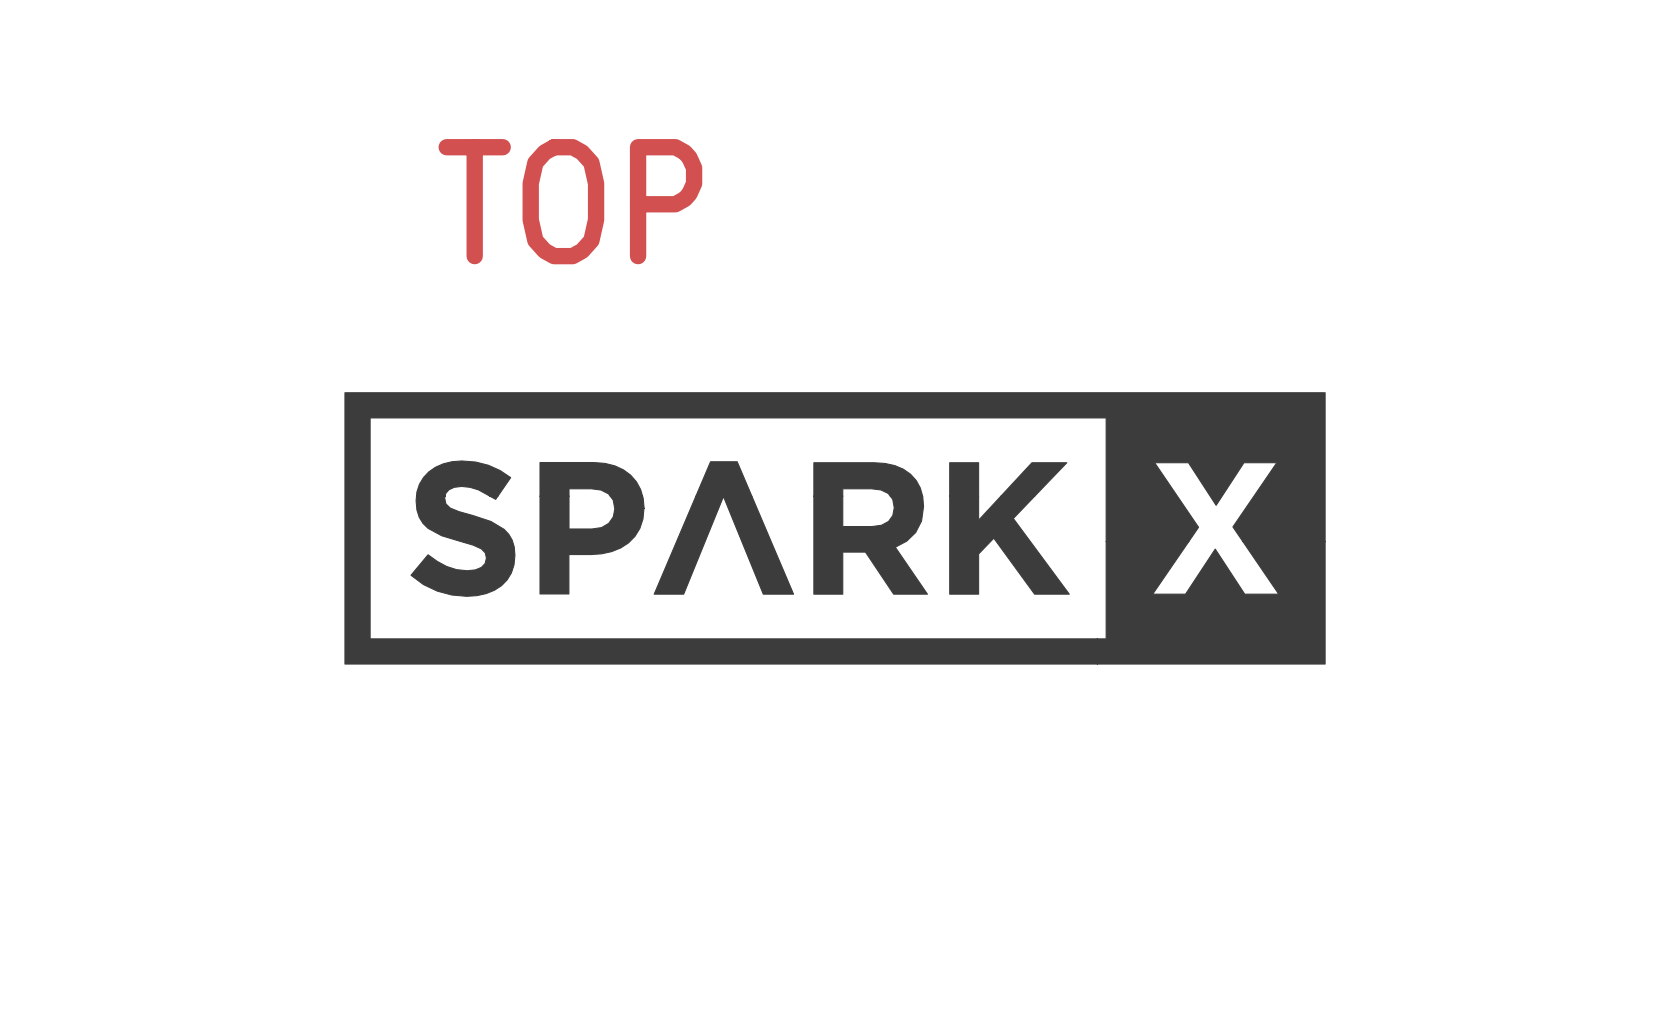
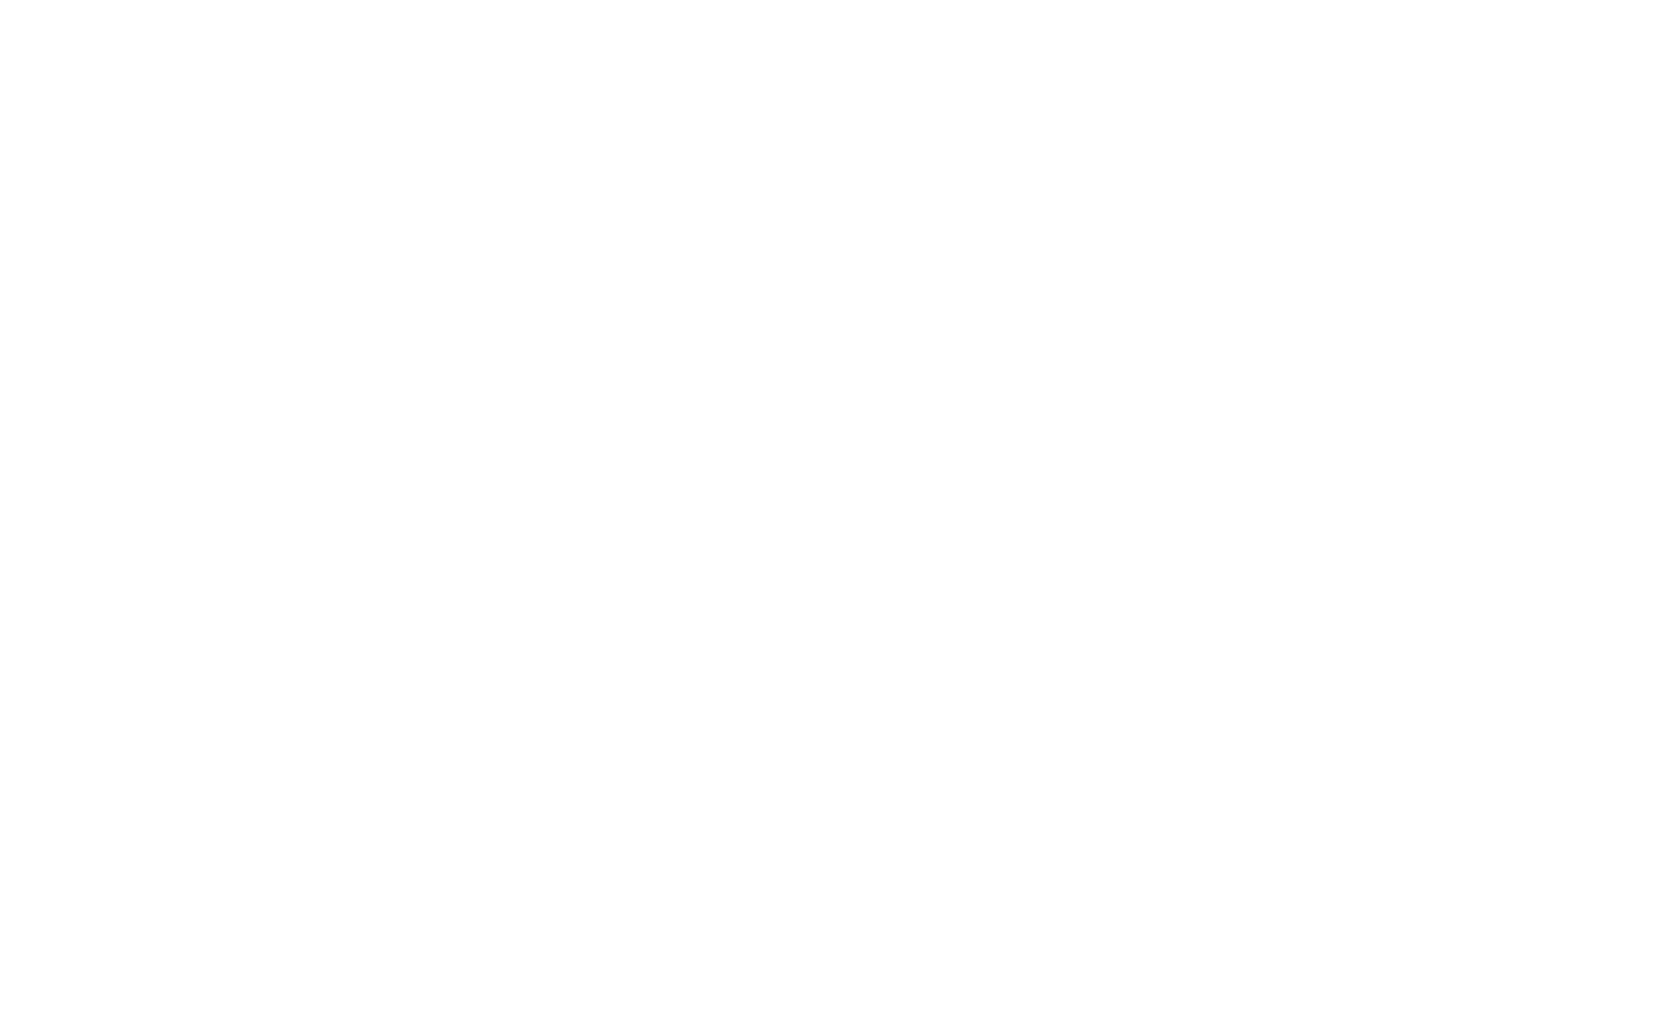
text: TOP (570, 201) -> none
drawing: [344, 392, 1326, 665] -> none

